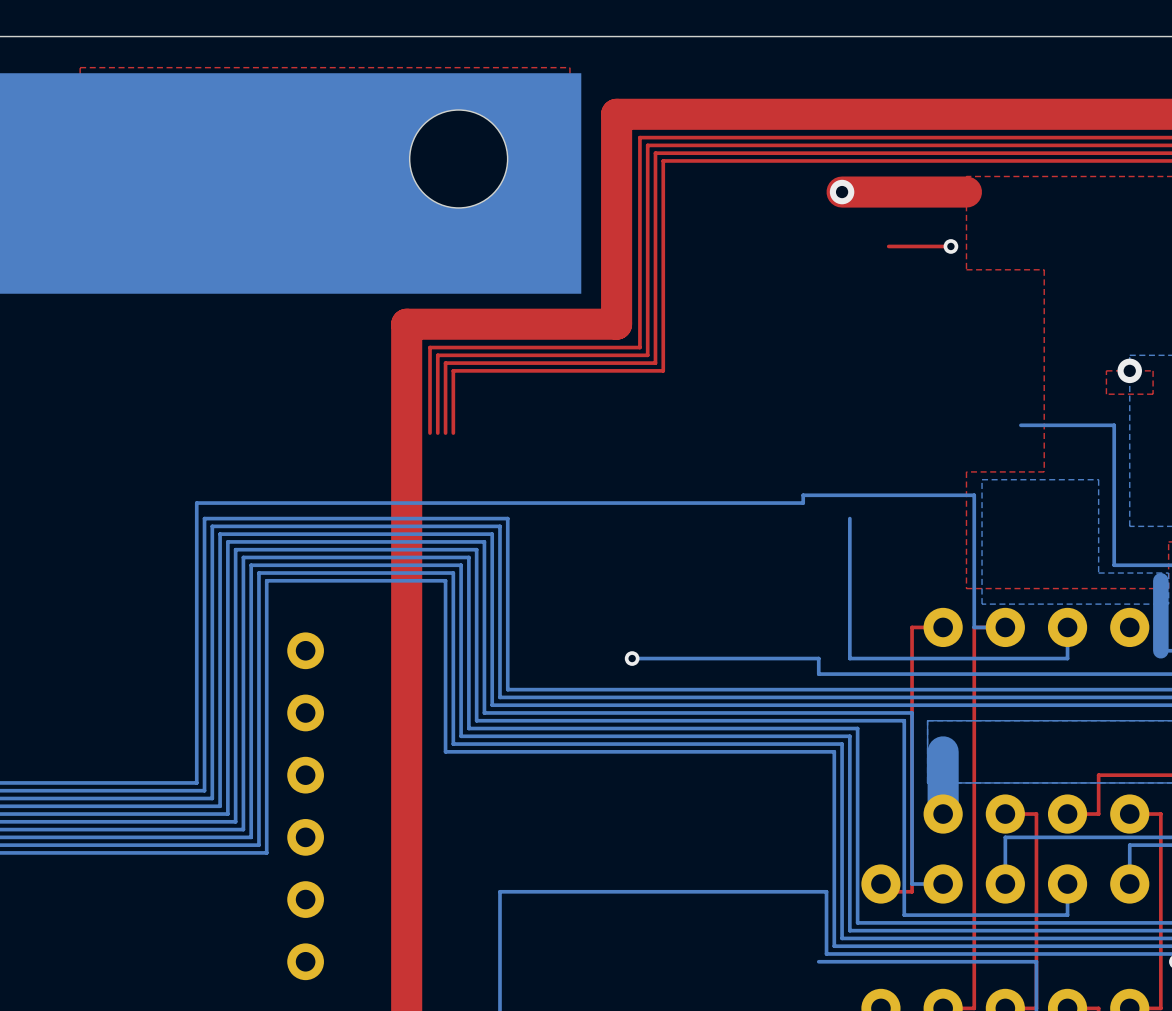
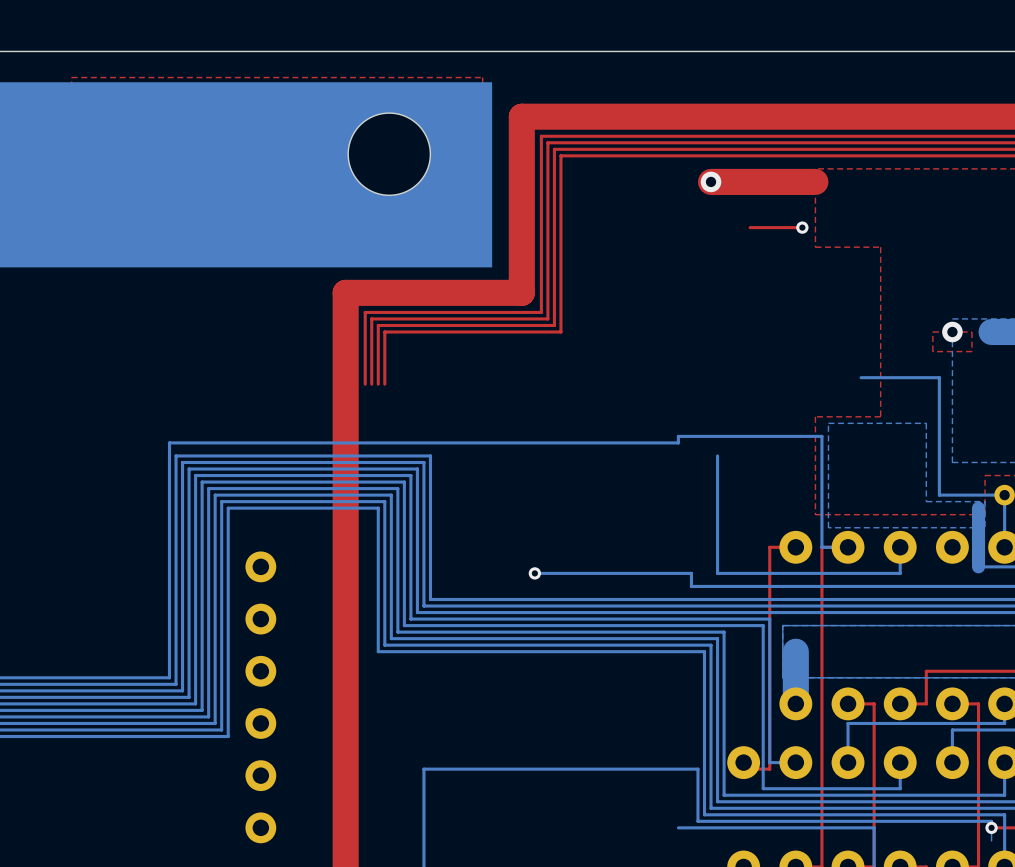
bottom track: none -> (691, 827) (678, 827)

